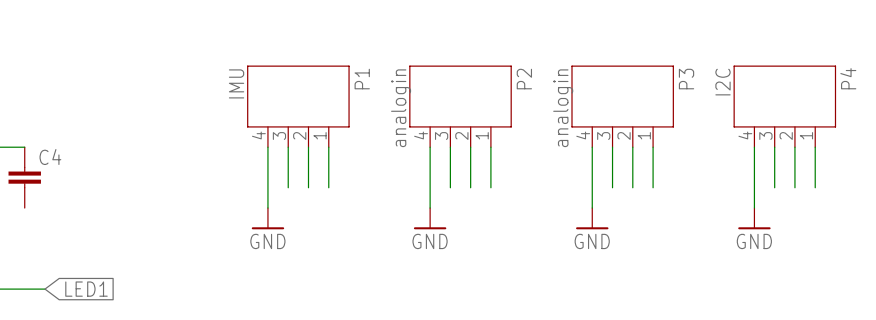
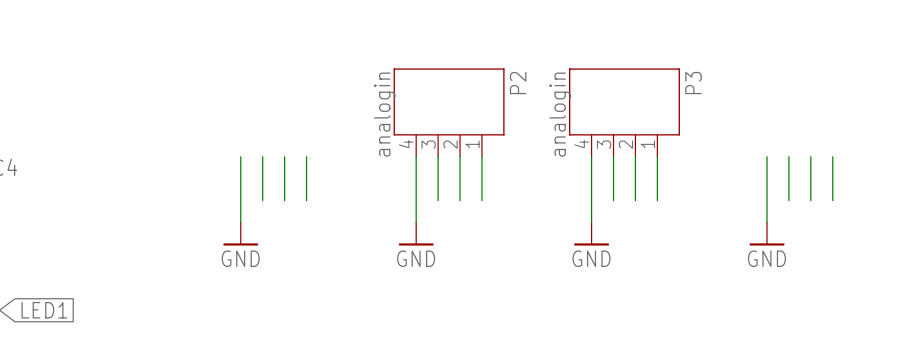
P1: IMU (298, 106) -> none
P4: I2C (784, 106) -> none

